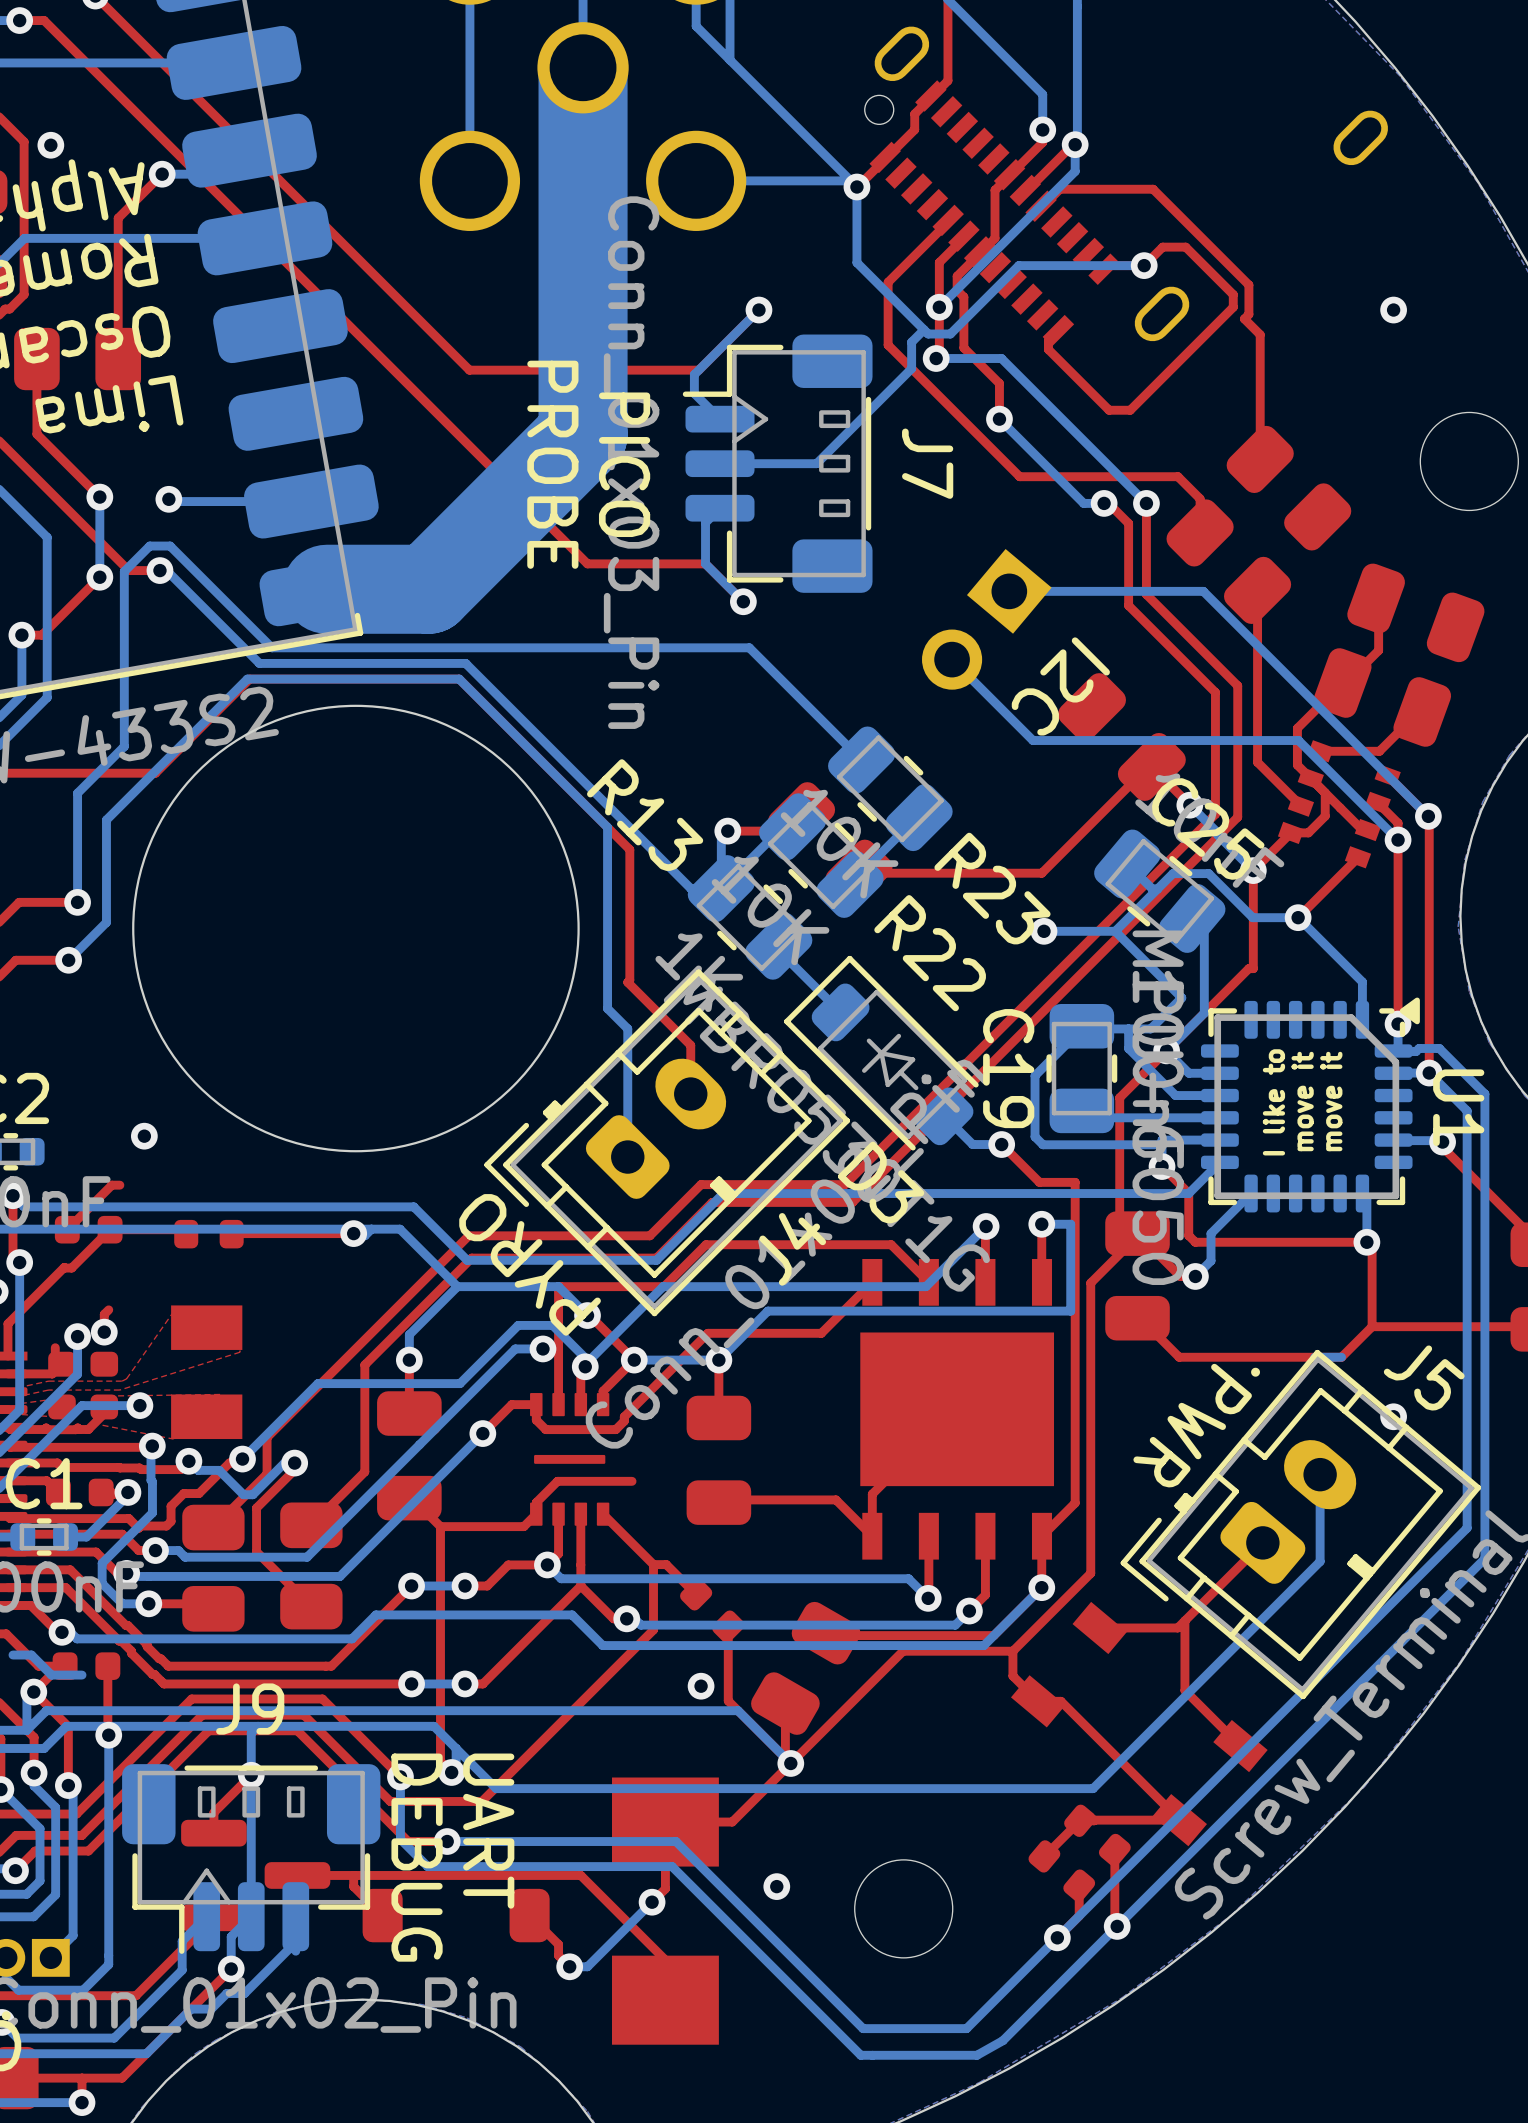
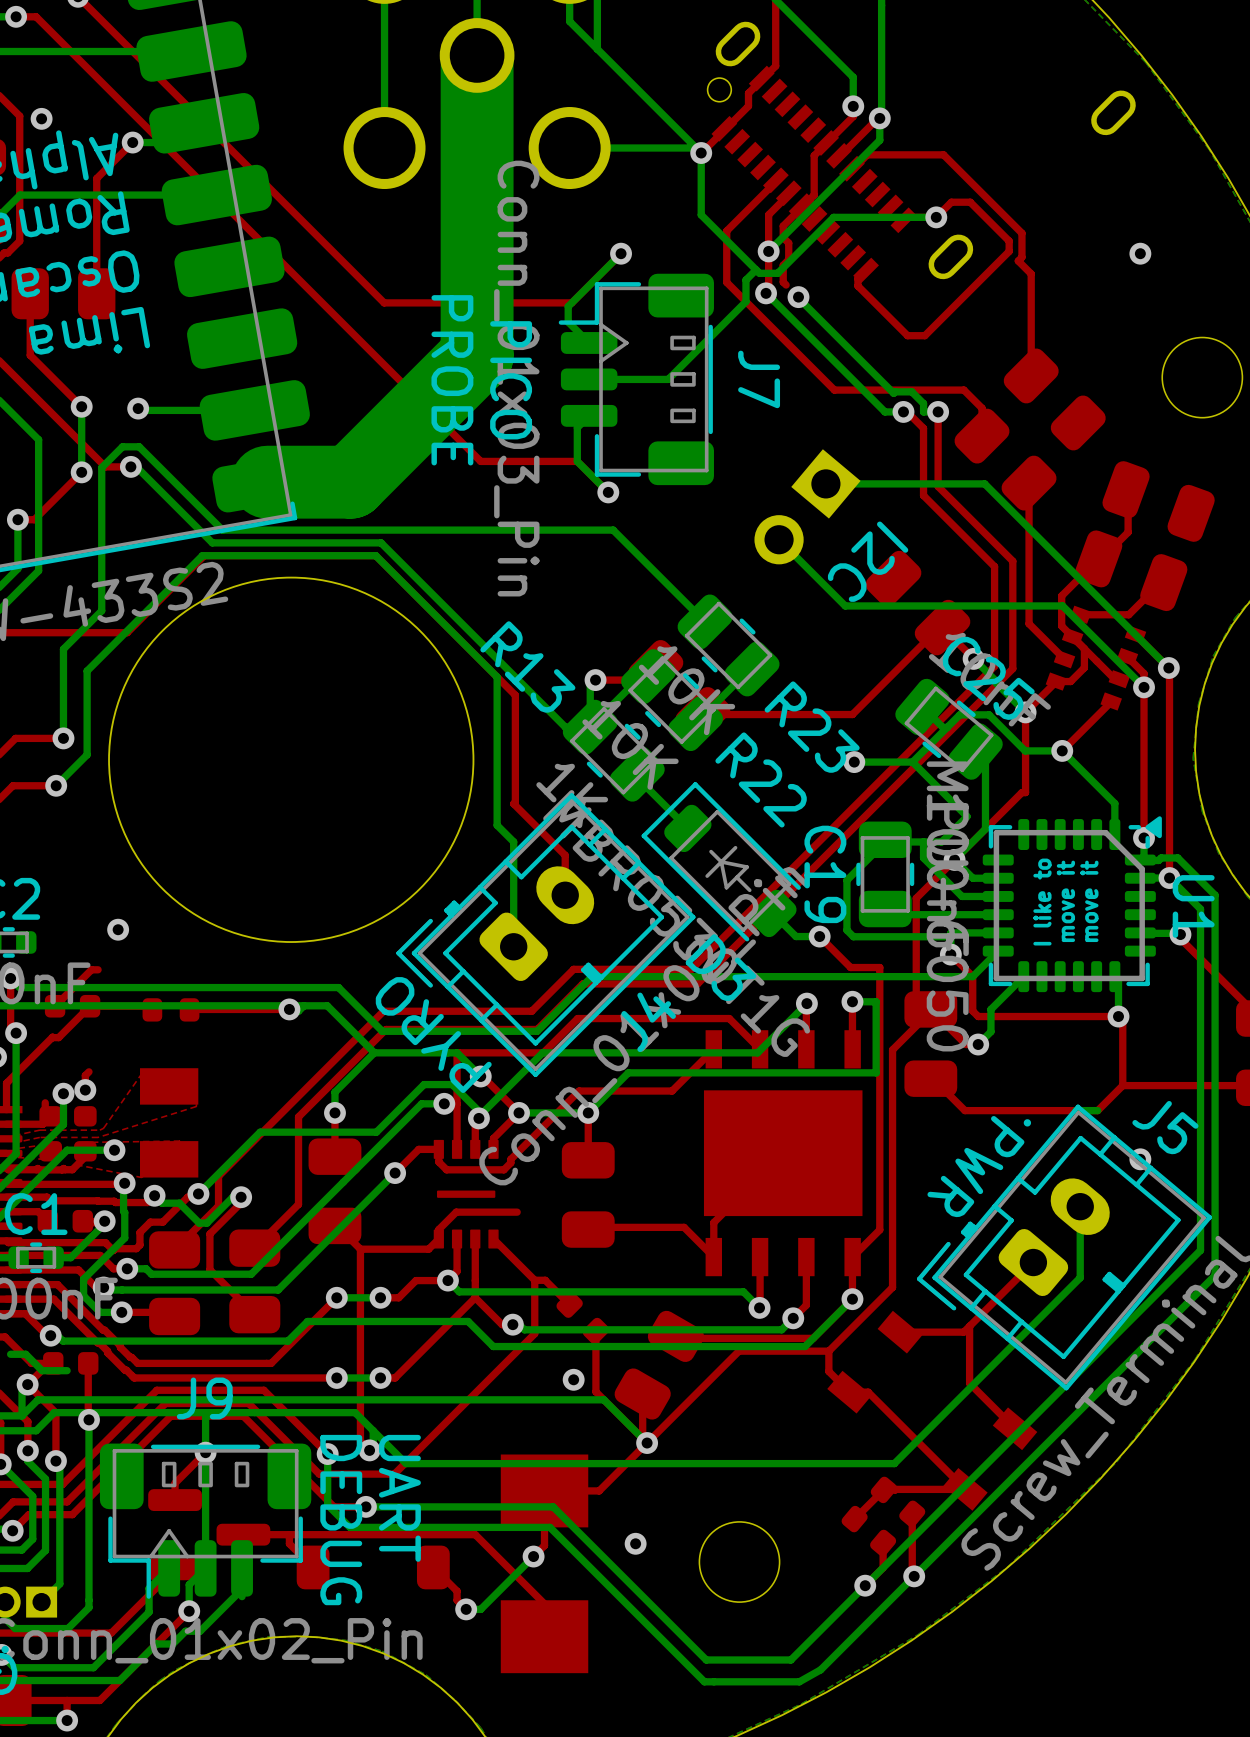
top track: (963, 317) (963, 347) (999, 383) (999, 419) -> (788, 259) (783, 265) (783, 282) (786, 285)
bottom track: (936, 358) (1001, 358) (1146, 503) -> (798, 297) (893, 393) (911, 391) (923, 403) (923, 411) (938, 411)
bottom track: (999, 419) (1083, 503) -> (773, 300) (886, 411)
via position: (999, 419) -> (798, 297)

